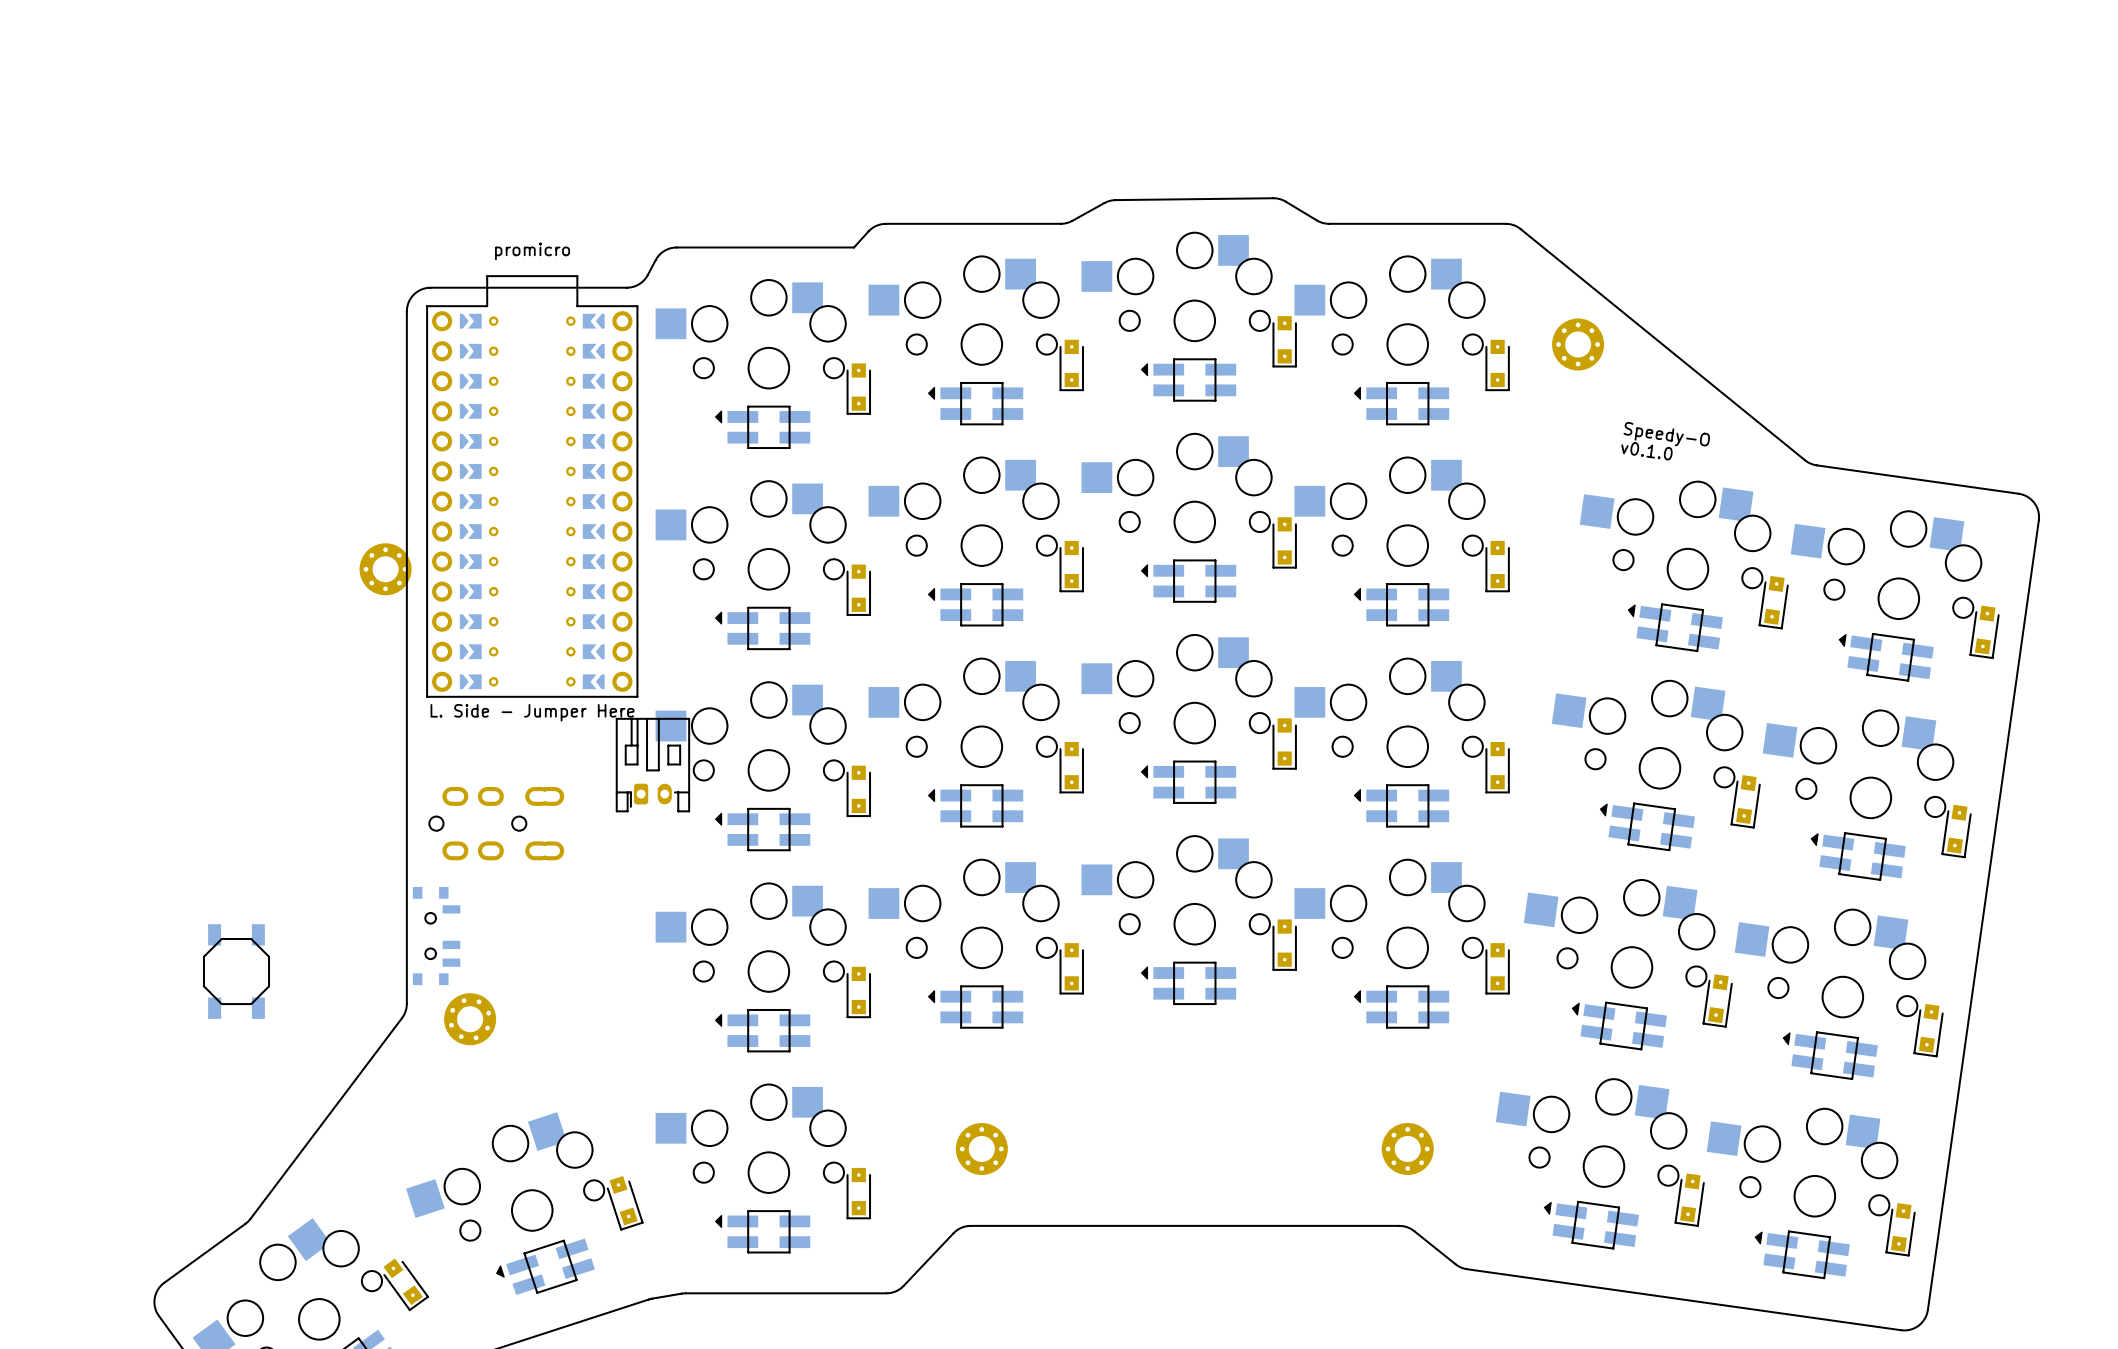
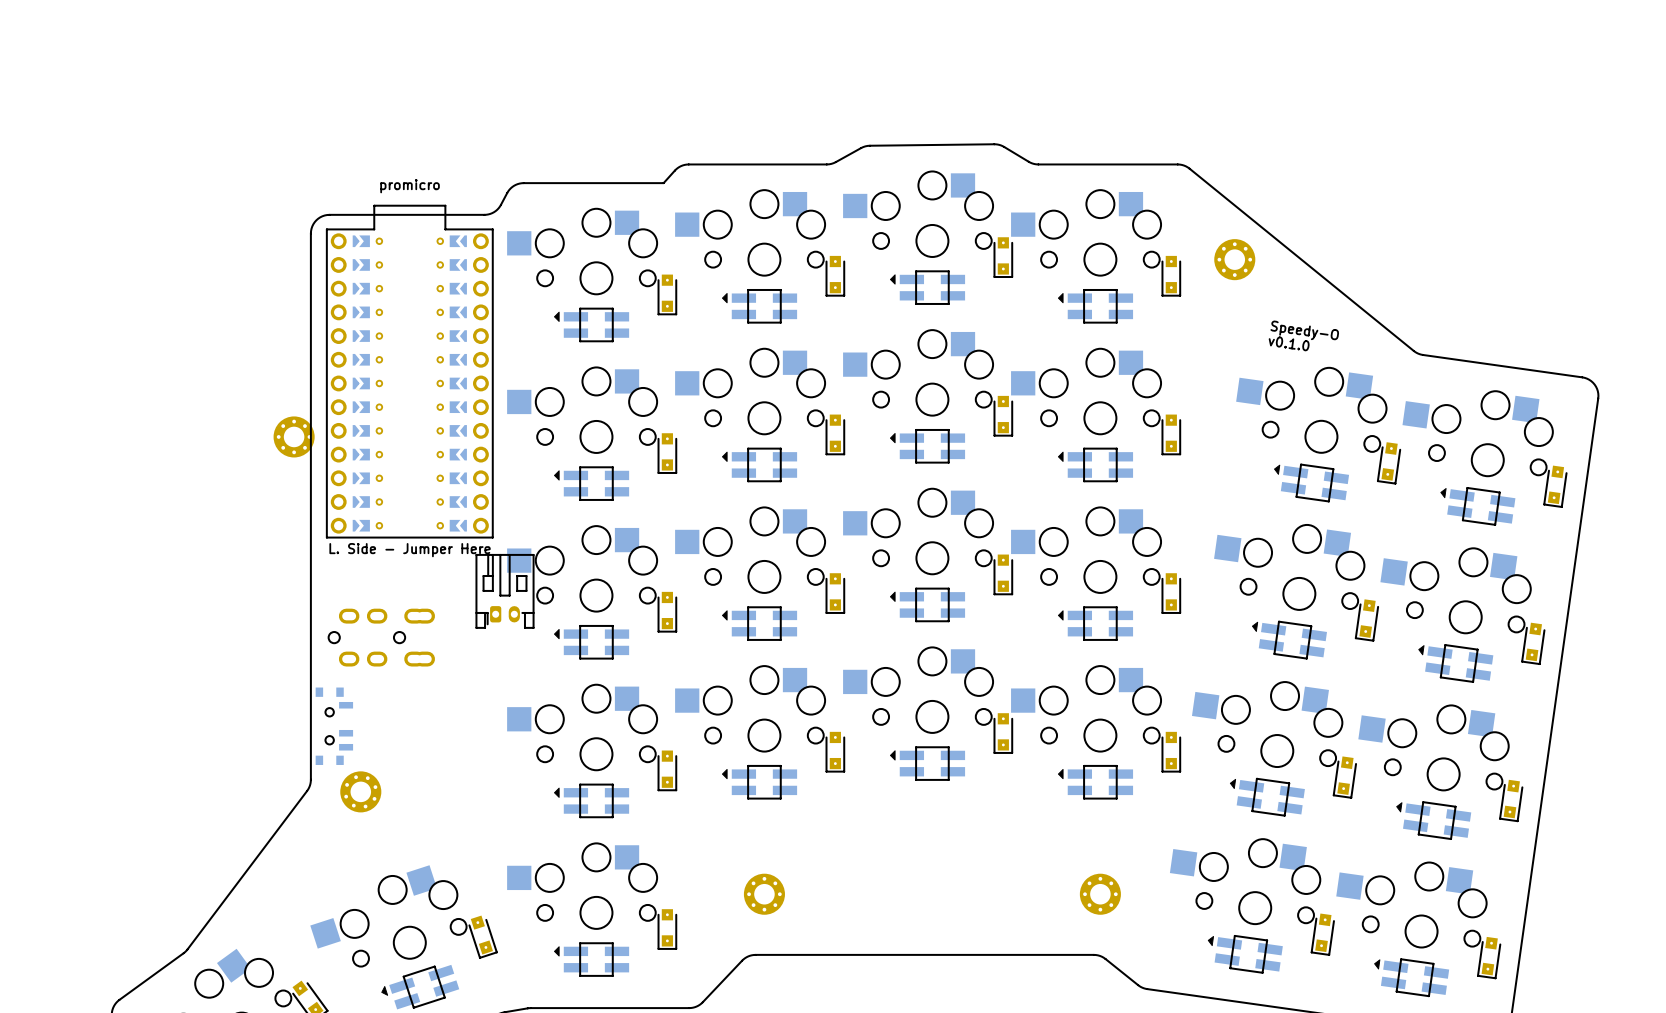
part: (236, 971) -> none

